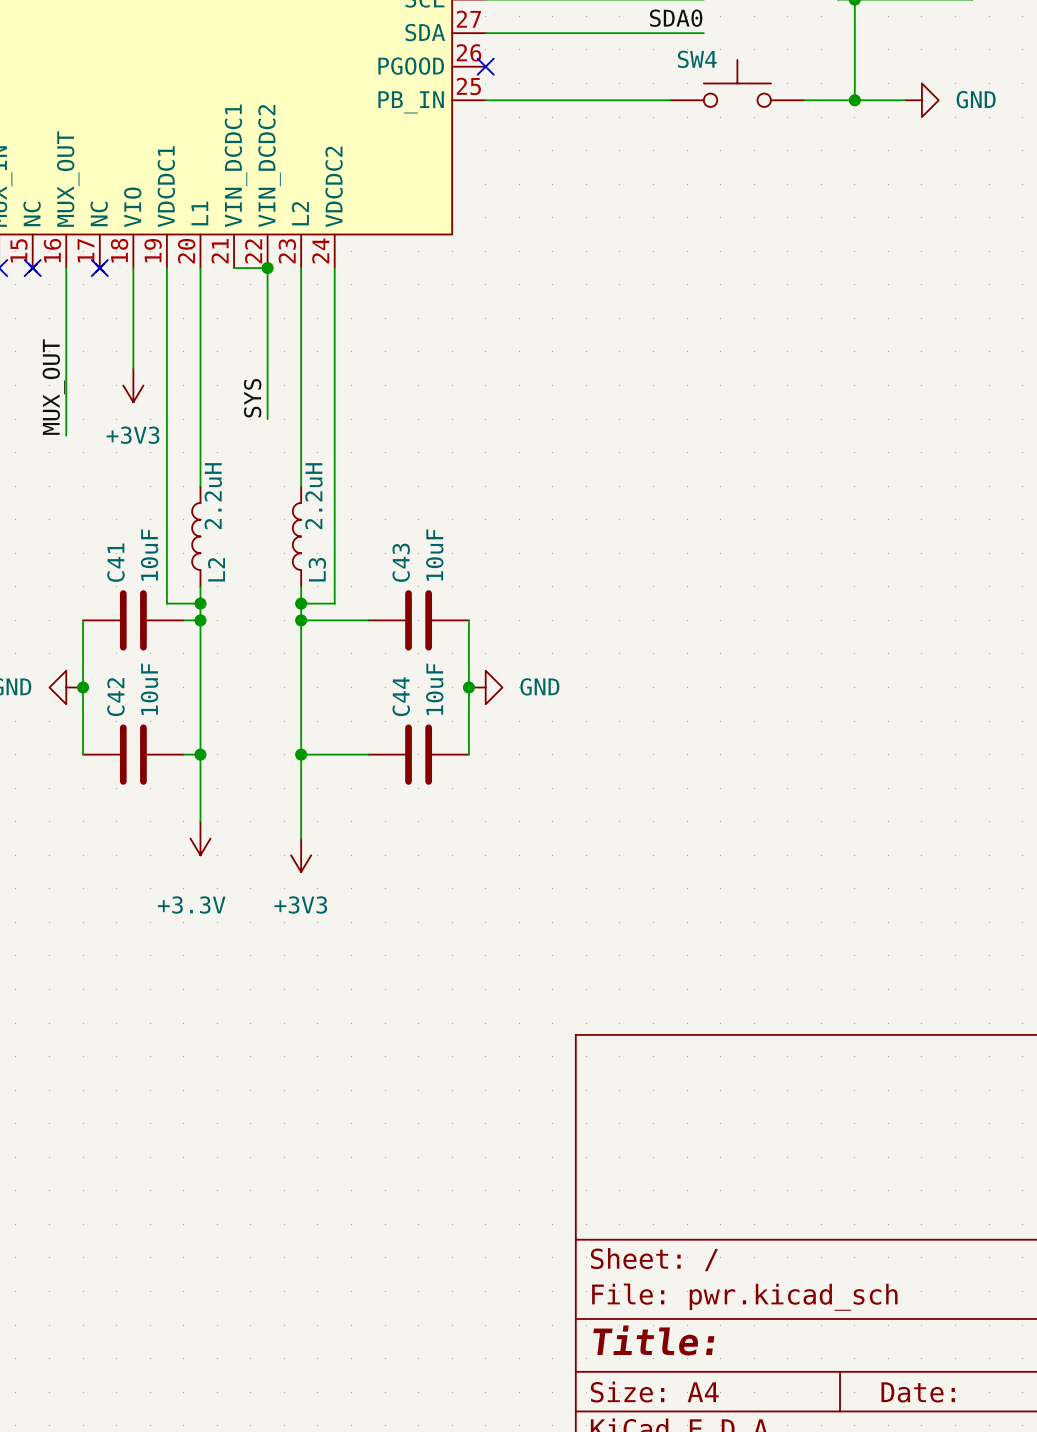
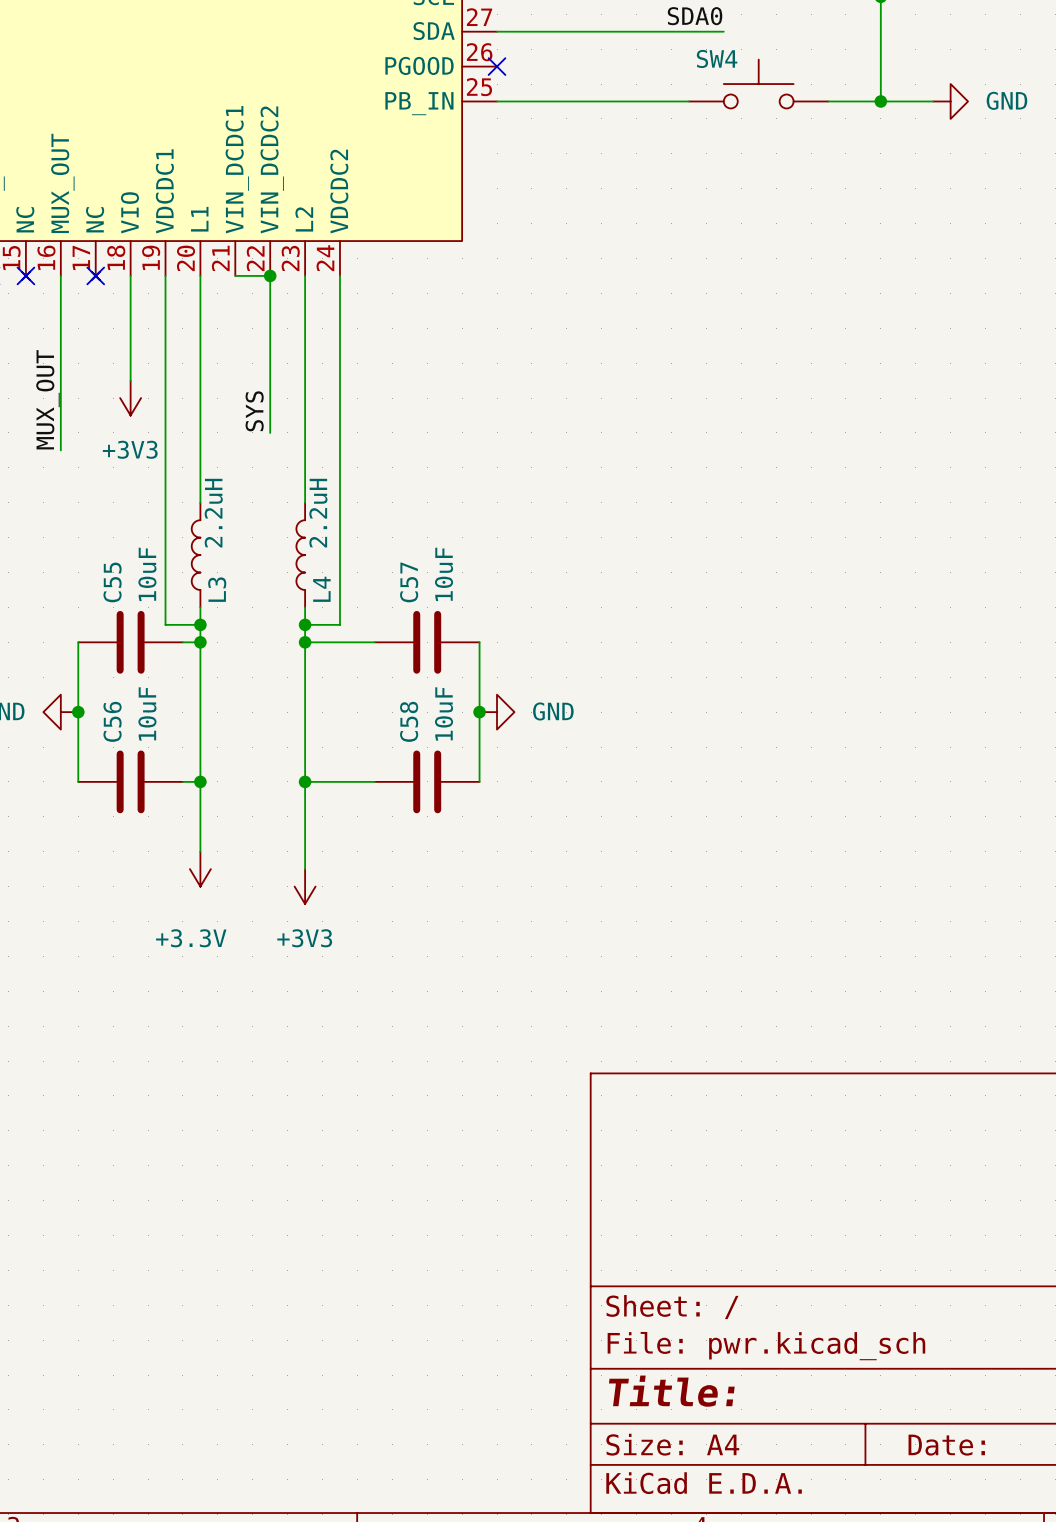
C41 name: C41 (115, 562) -> C55 (112, 582)
C43 name: C43 (401, 562) -> C57 (409, 582)
L2 name: L2 (216, 569) -> L3 (217, 589)
L3 name: L3 (317, 569) -> L4 (321, 589)
C44 name: C44 (401, 696) -> C58 (409, 721)
C42 name: C42 (115, 697) -> C56 (112, 721)

